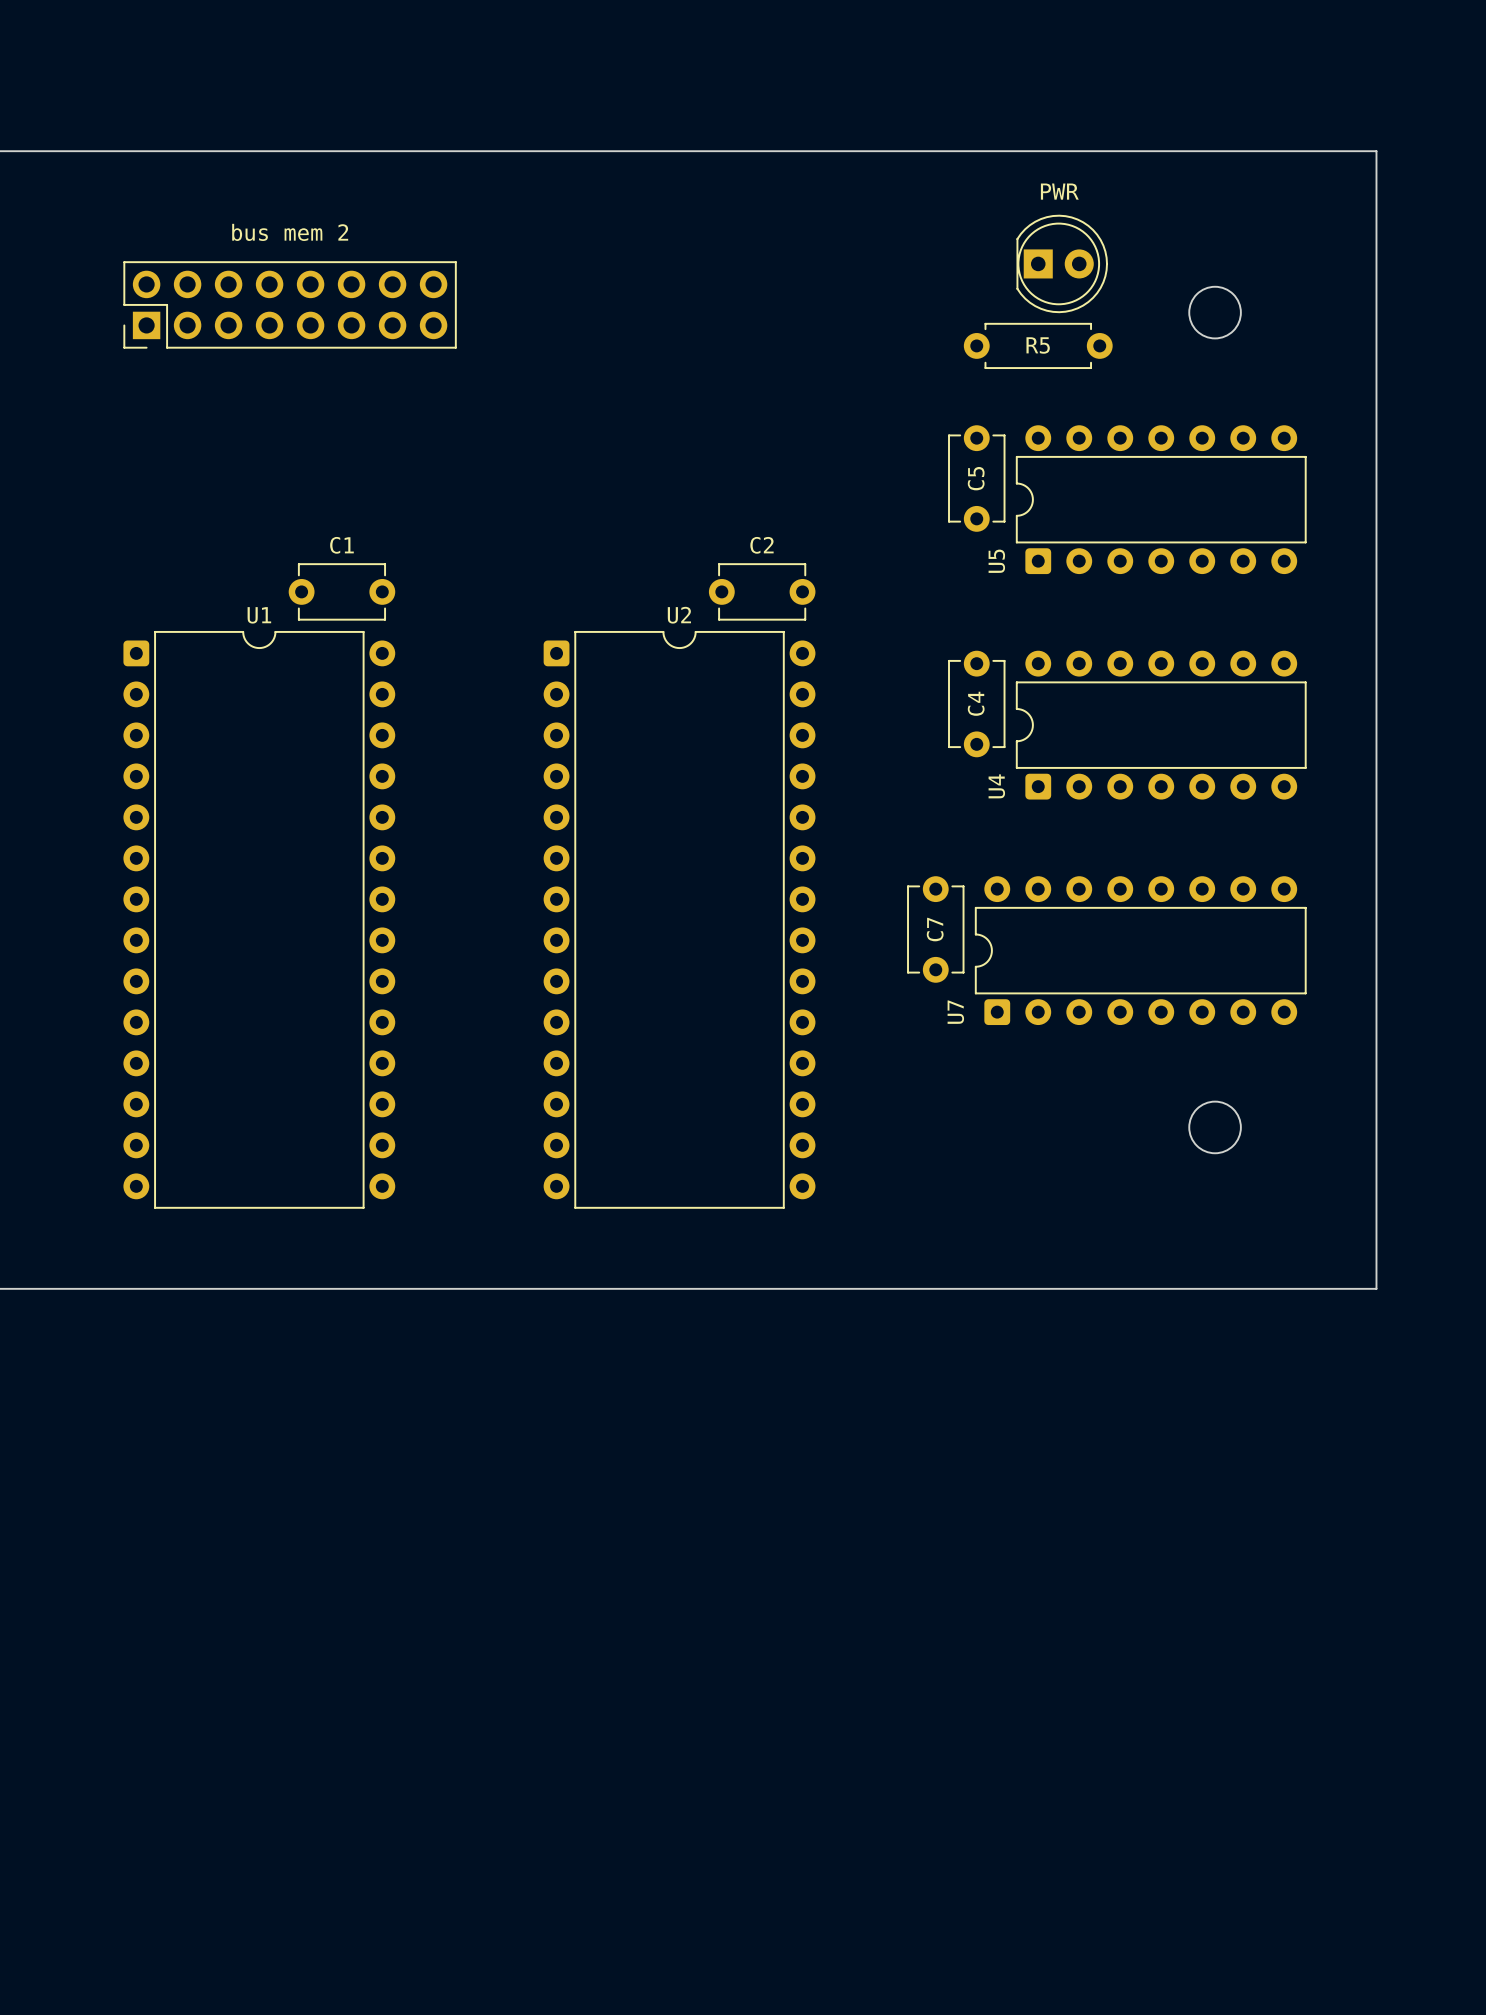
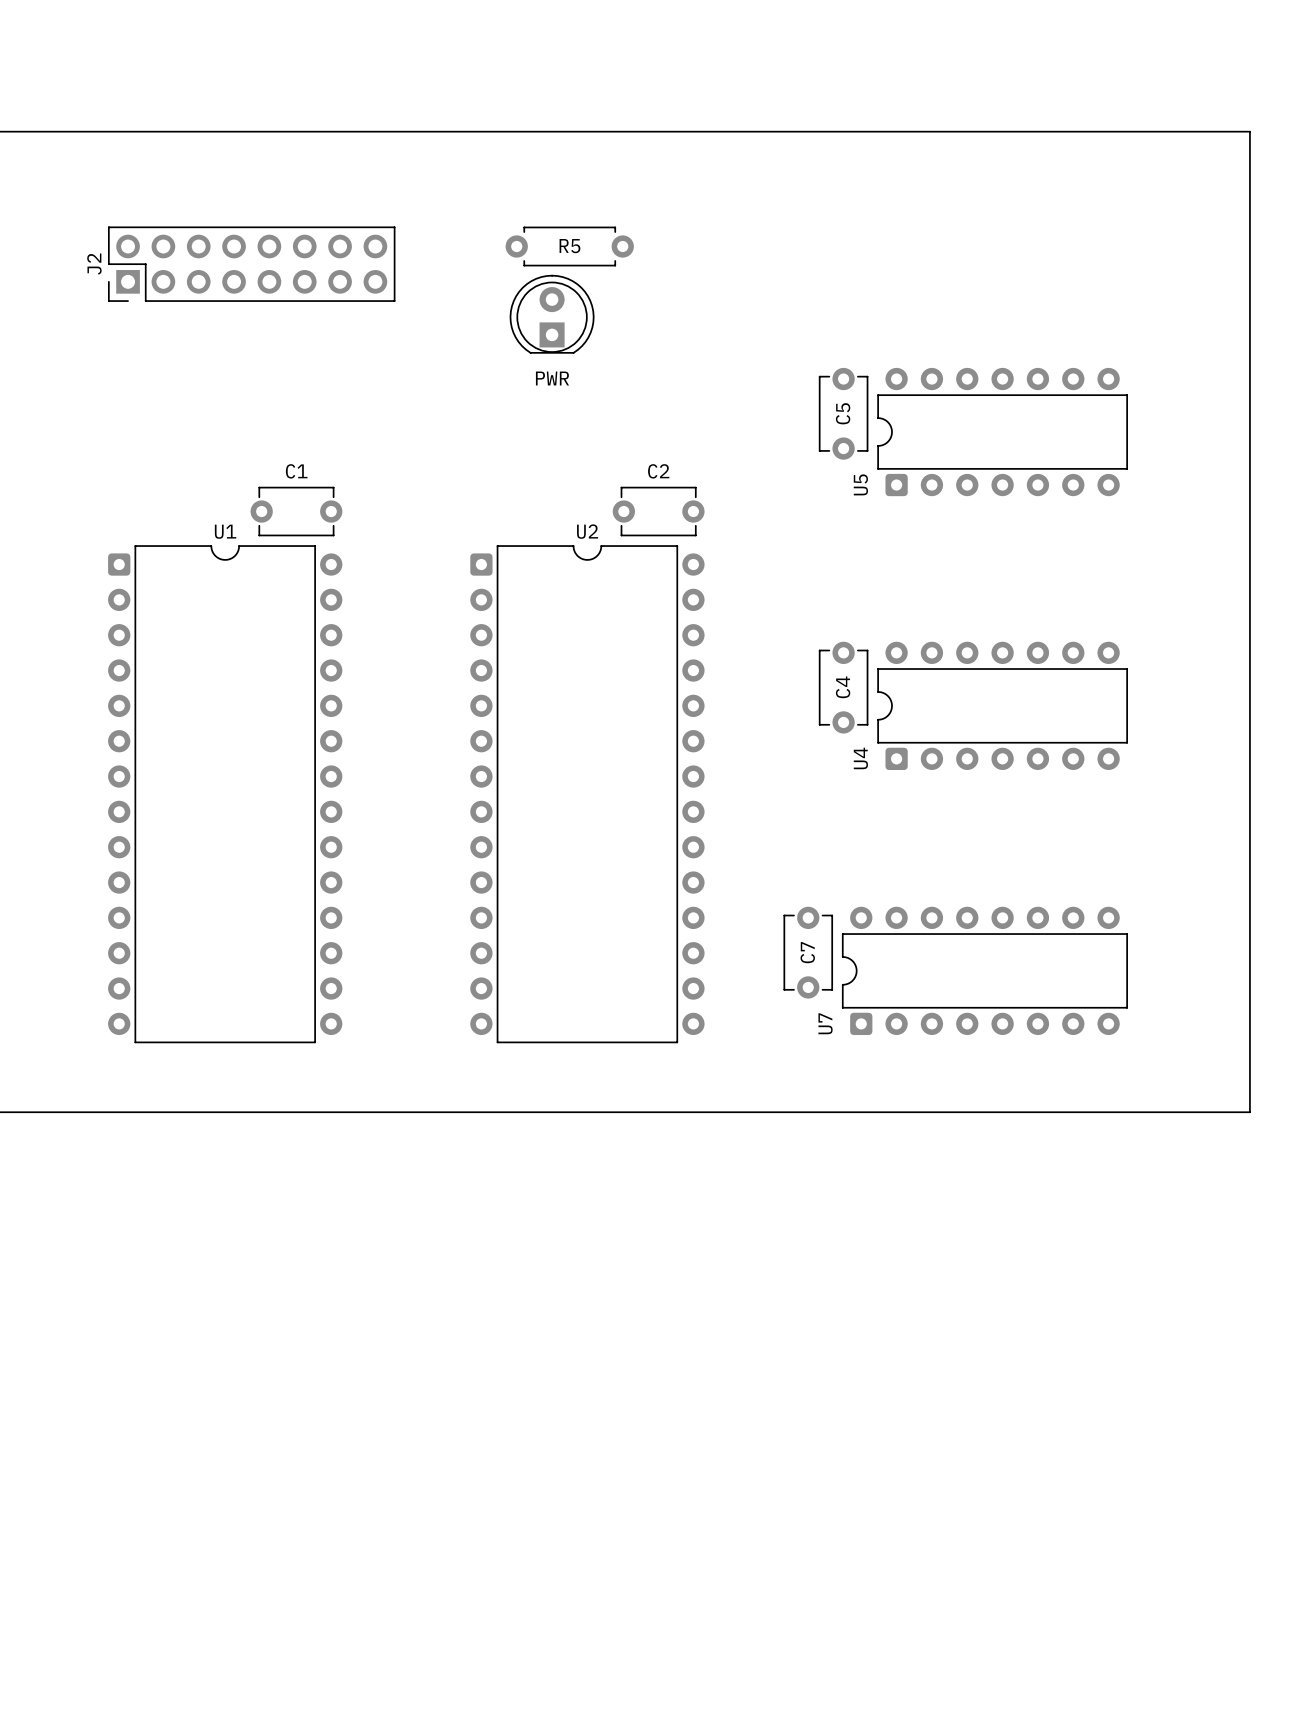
board edge: (1376, 151) (1376, 1288) -> (1188, 131) (1249, 131) (1249, 1112) (1188, 1112)
J2 value: bus mem 2 (290, 232) -> none
part: PWR (1062, 263) -> none
round board edge: [1188, 286, 1242, 339] -> none
J2 name: none -> J2 (94, 264)
R5 position: (1038, 345) -> (569, 246)
part: none -> PWR (552, 314)
C4 position: (976, 704) -> (843, 687)
U4 position: (1161, 725) -> (1002, 705)
C7 position: (935, 929) -> (808, 952)
U7 position: (1140, 950) -> (984, 970)
round board edge: [1188, 1101, 1242, 1154] -> none

